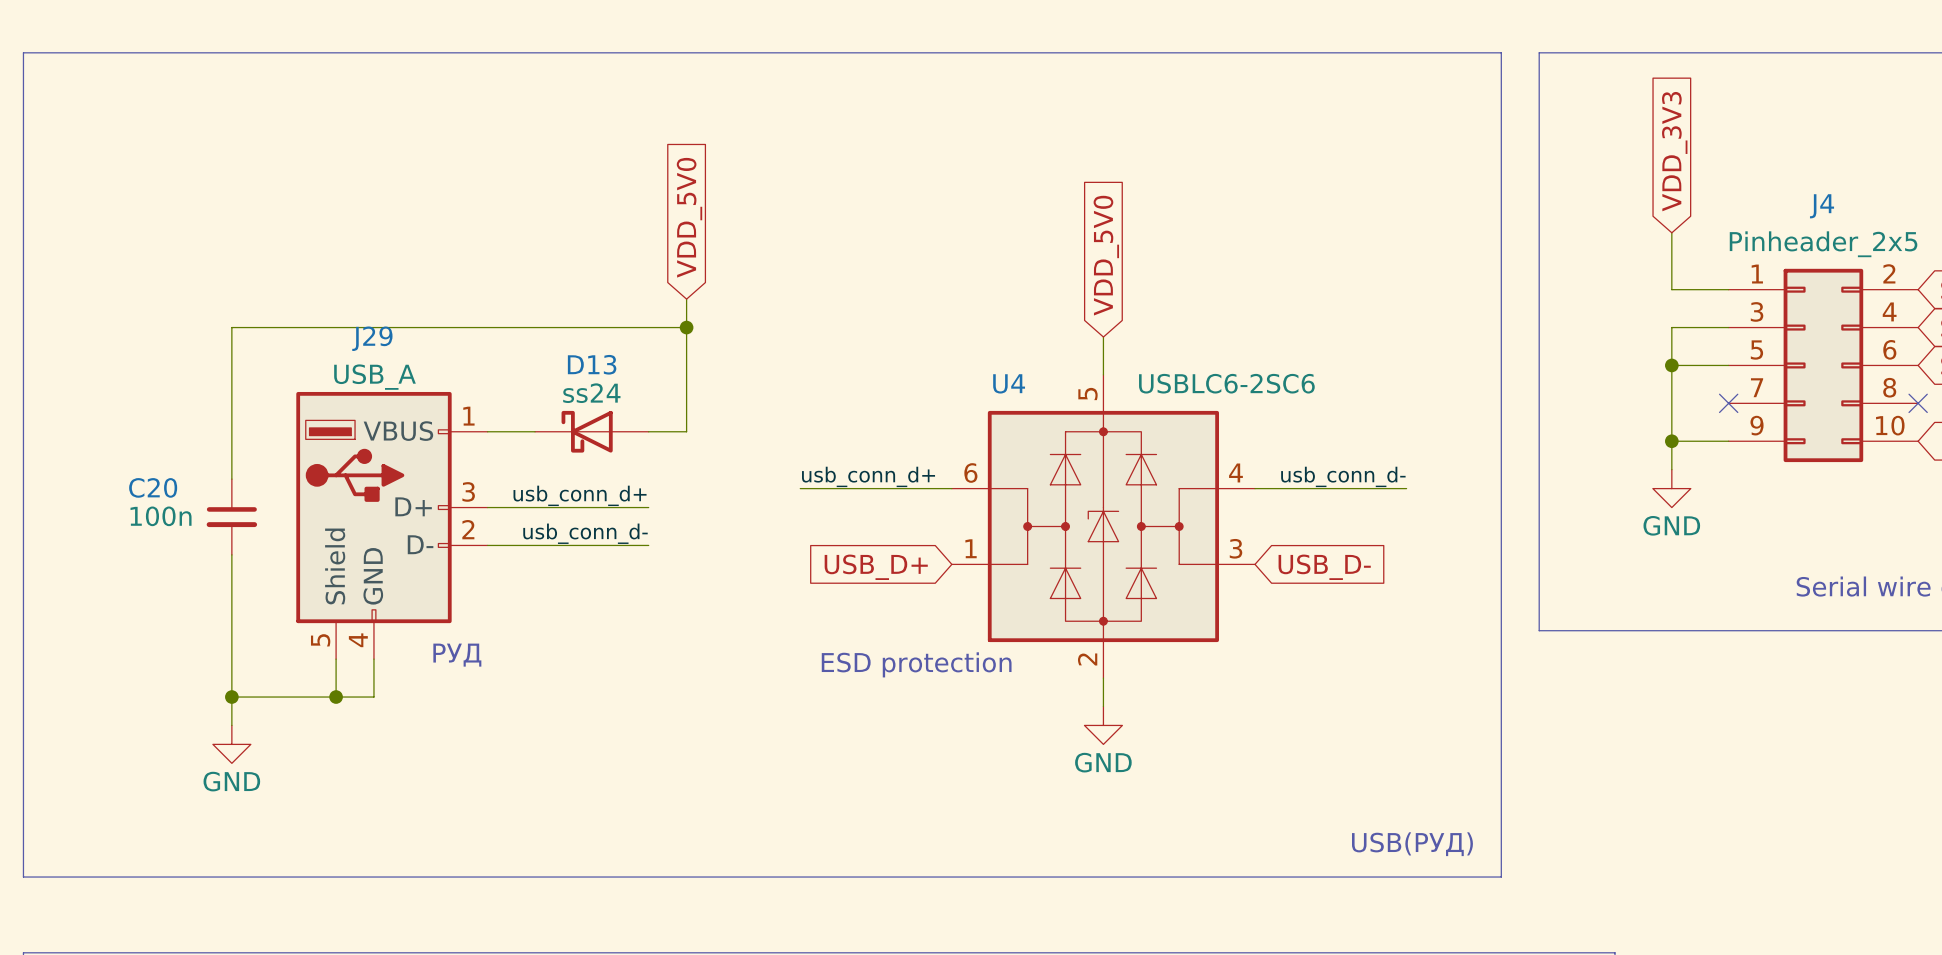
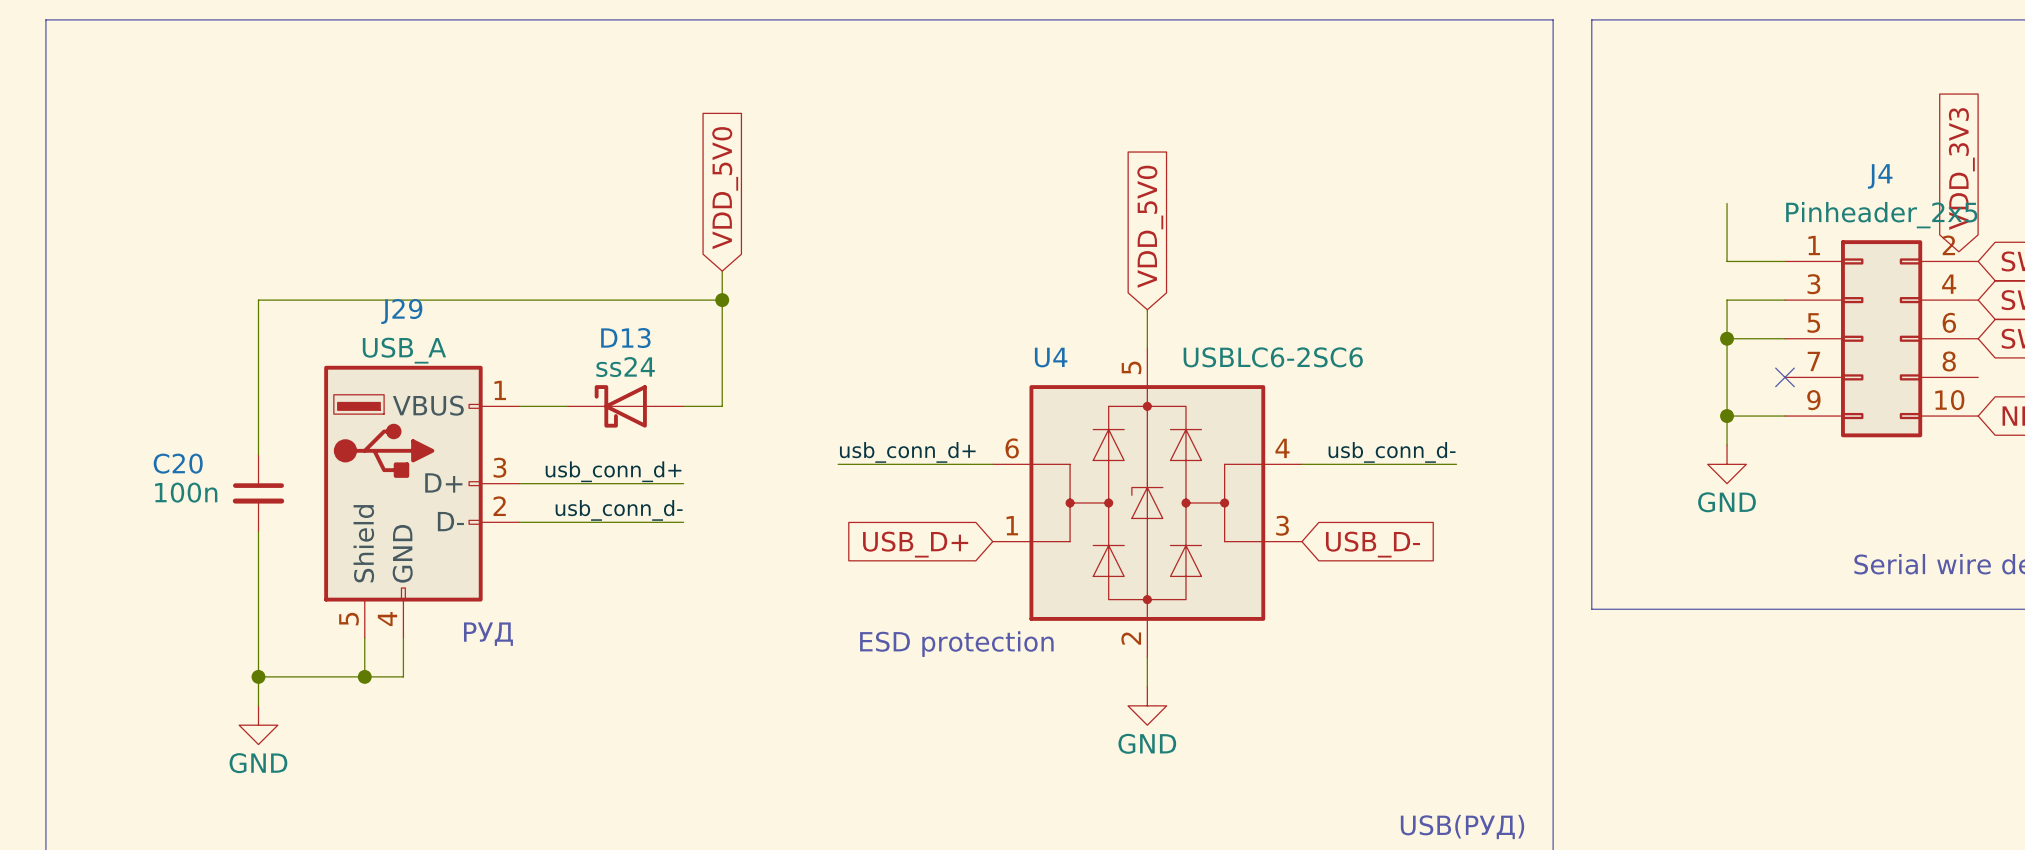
global label position: VDD_3V3 (1674, 151) -> VDD_3V3 (1961, 168)
no-connect mark: (1918, 403) -> none

